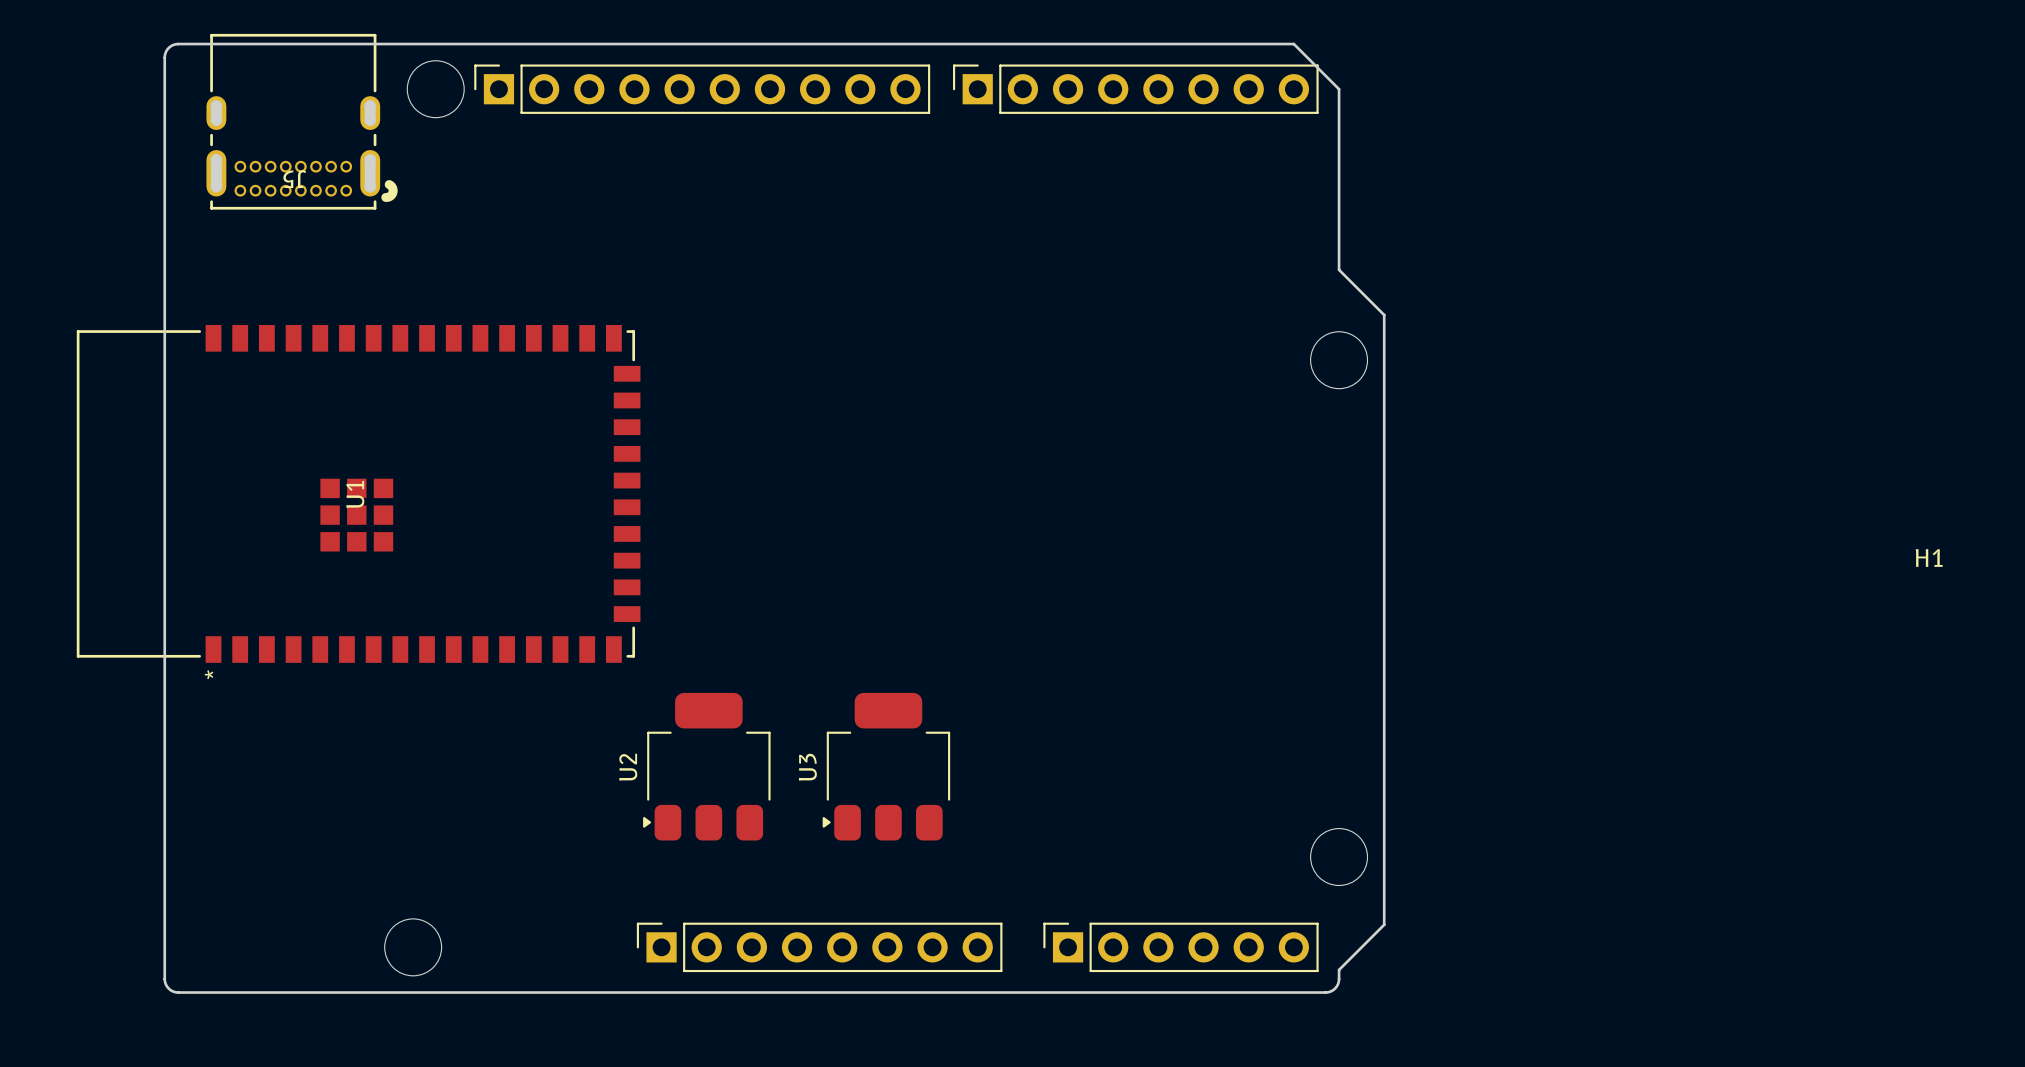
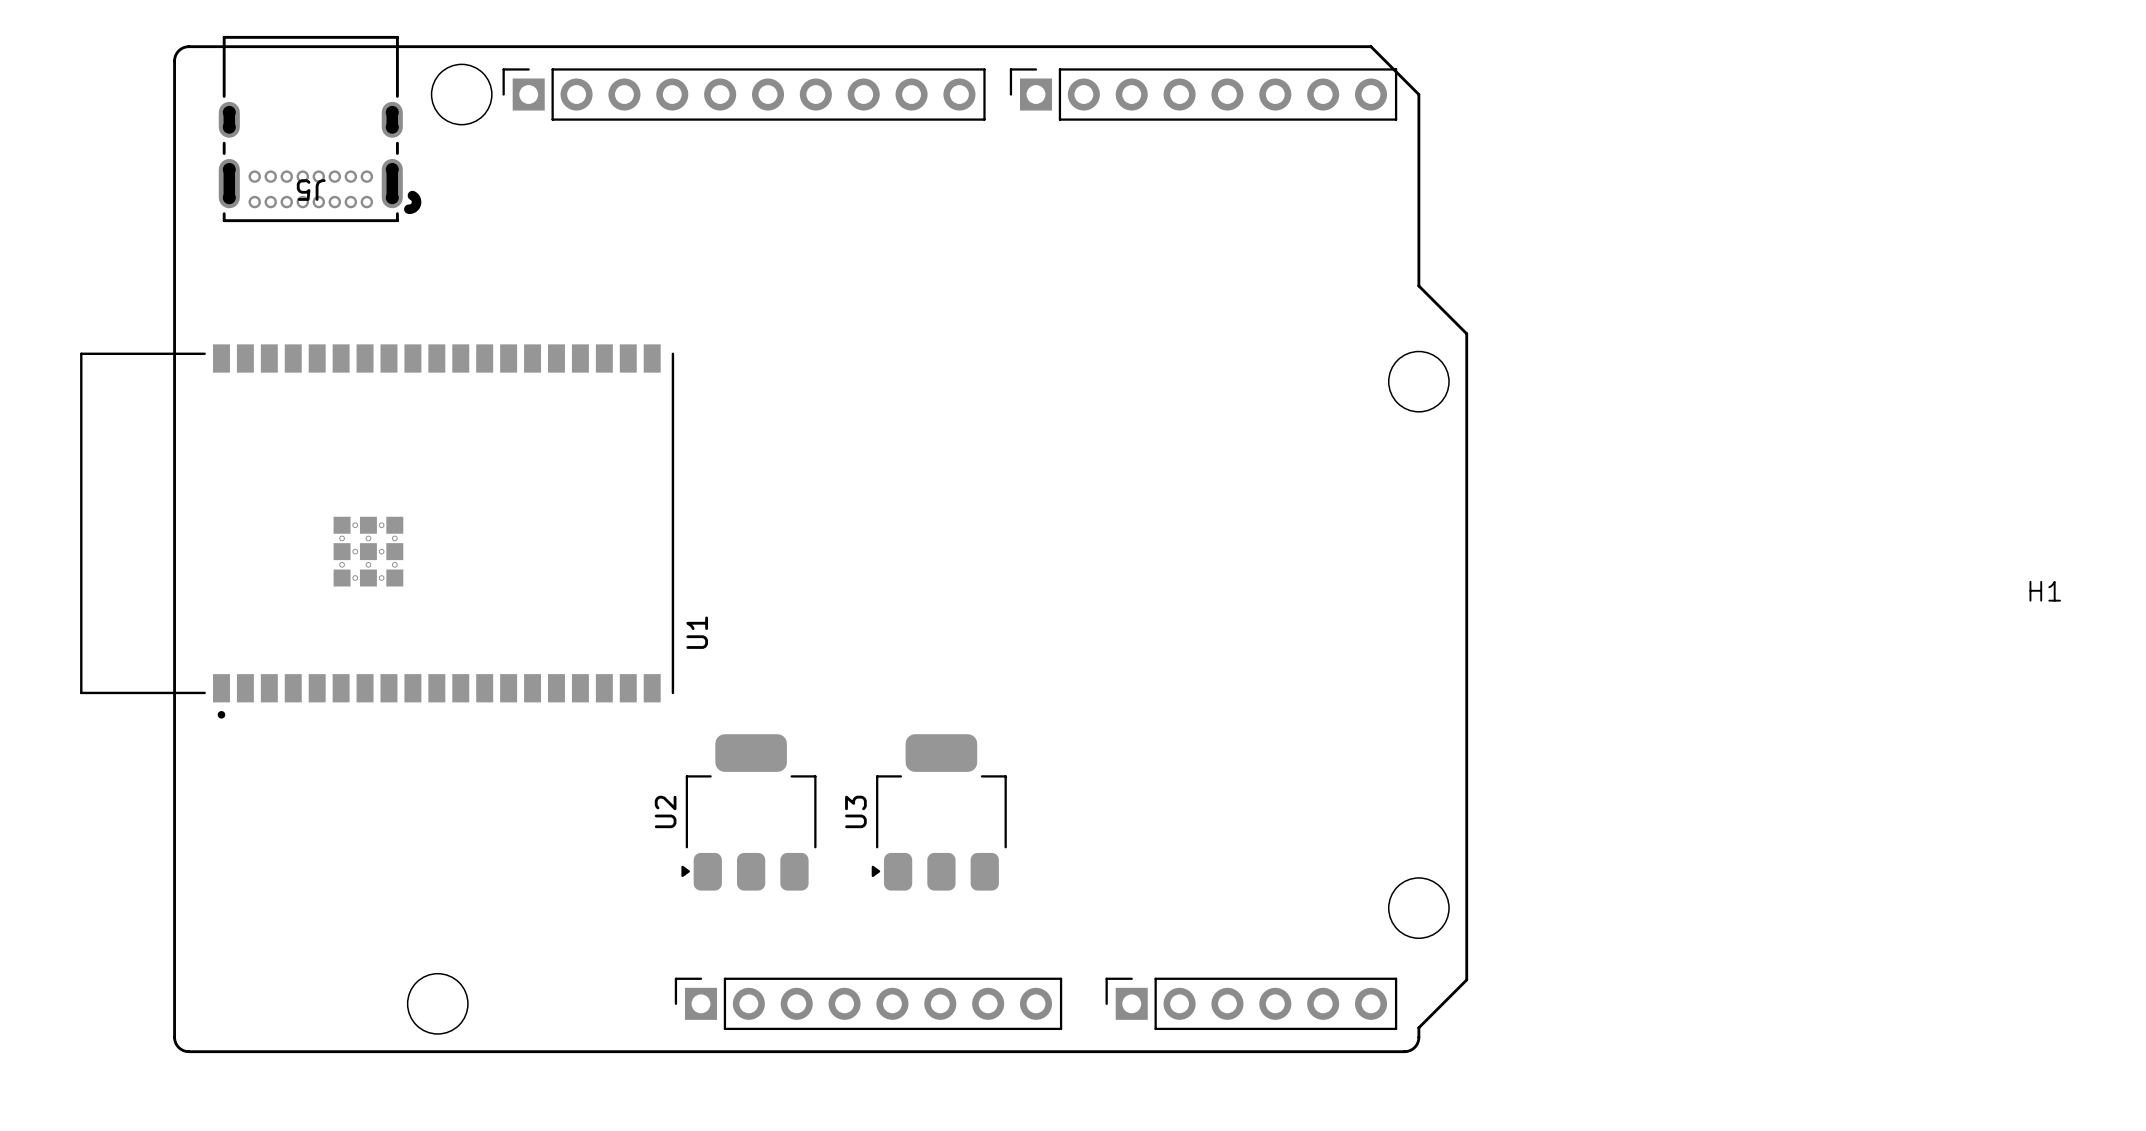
U1 footprint: [76, 325, 641, 663] -> [80, 344, 675, 719]
U1 name position: U1 (355, 494) -> U1 (697, 632)

